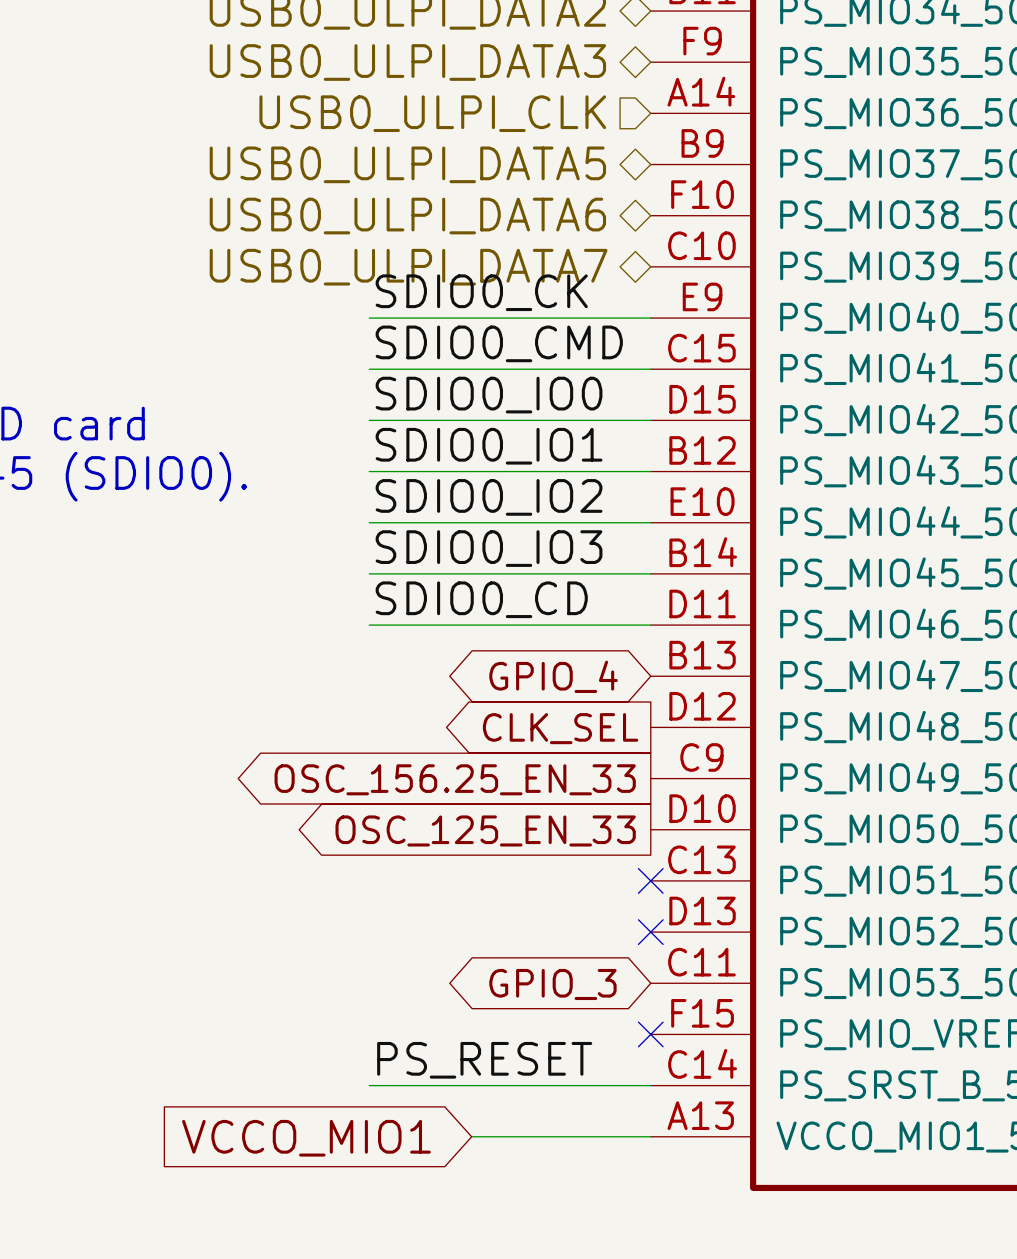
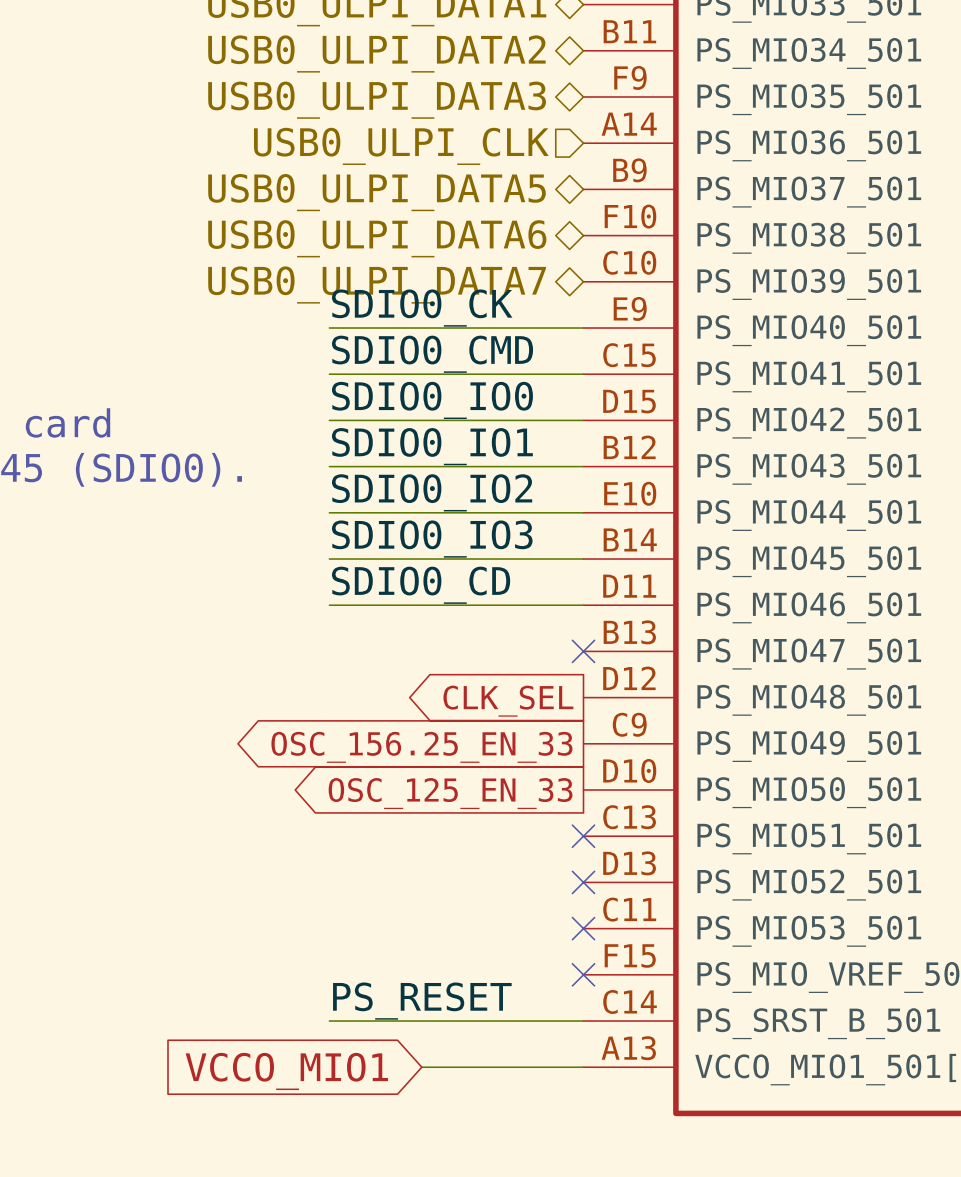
global label: GPIO_4 (553, 676) -> none
no-connect mark: none -> (583, 651)
no-connect mark: none -> (583, 928)
global label: GPIO_3 (552, 984) -> none

